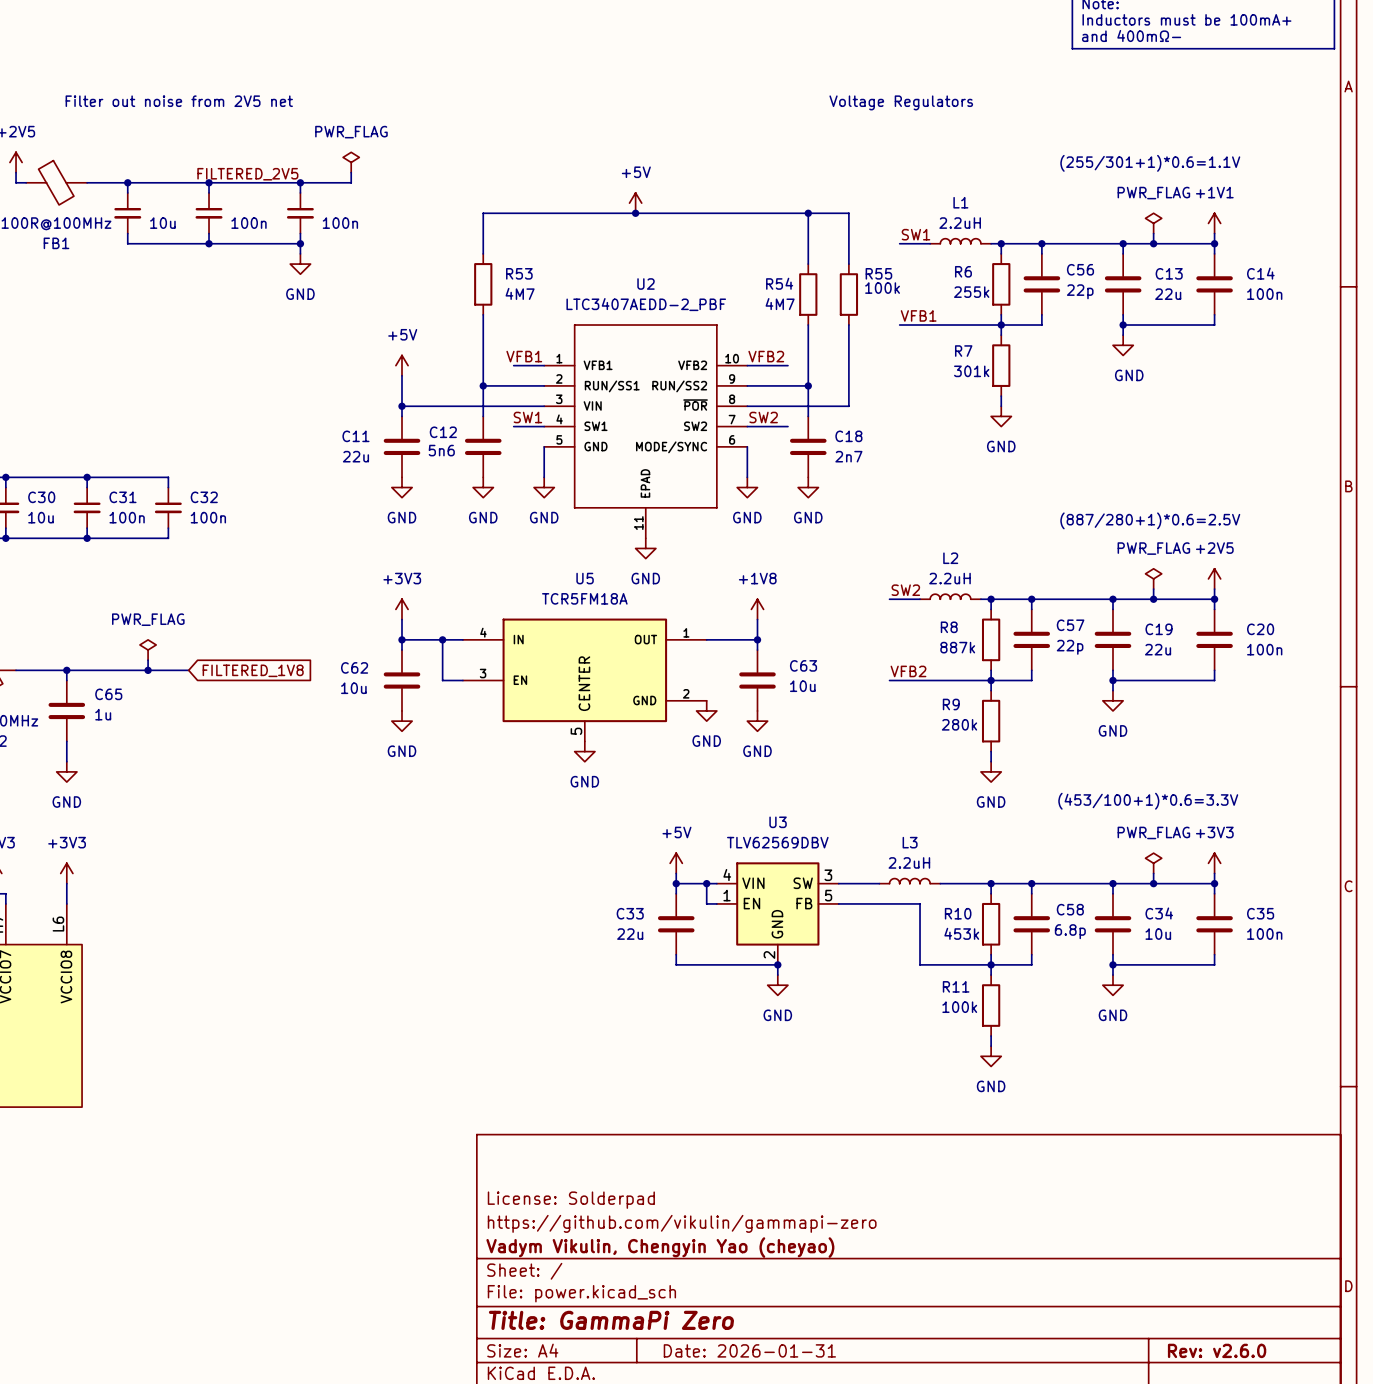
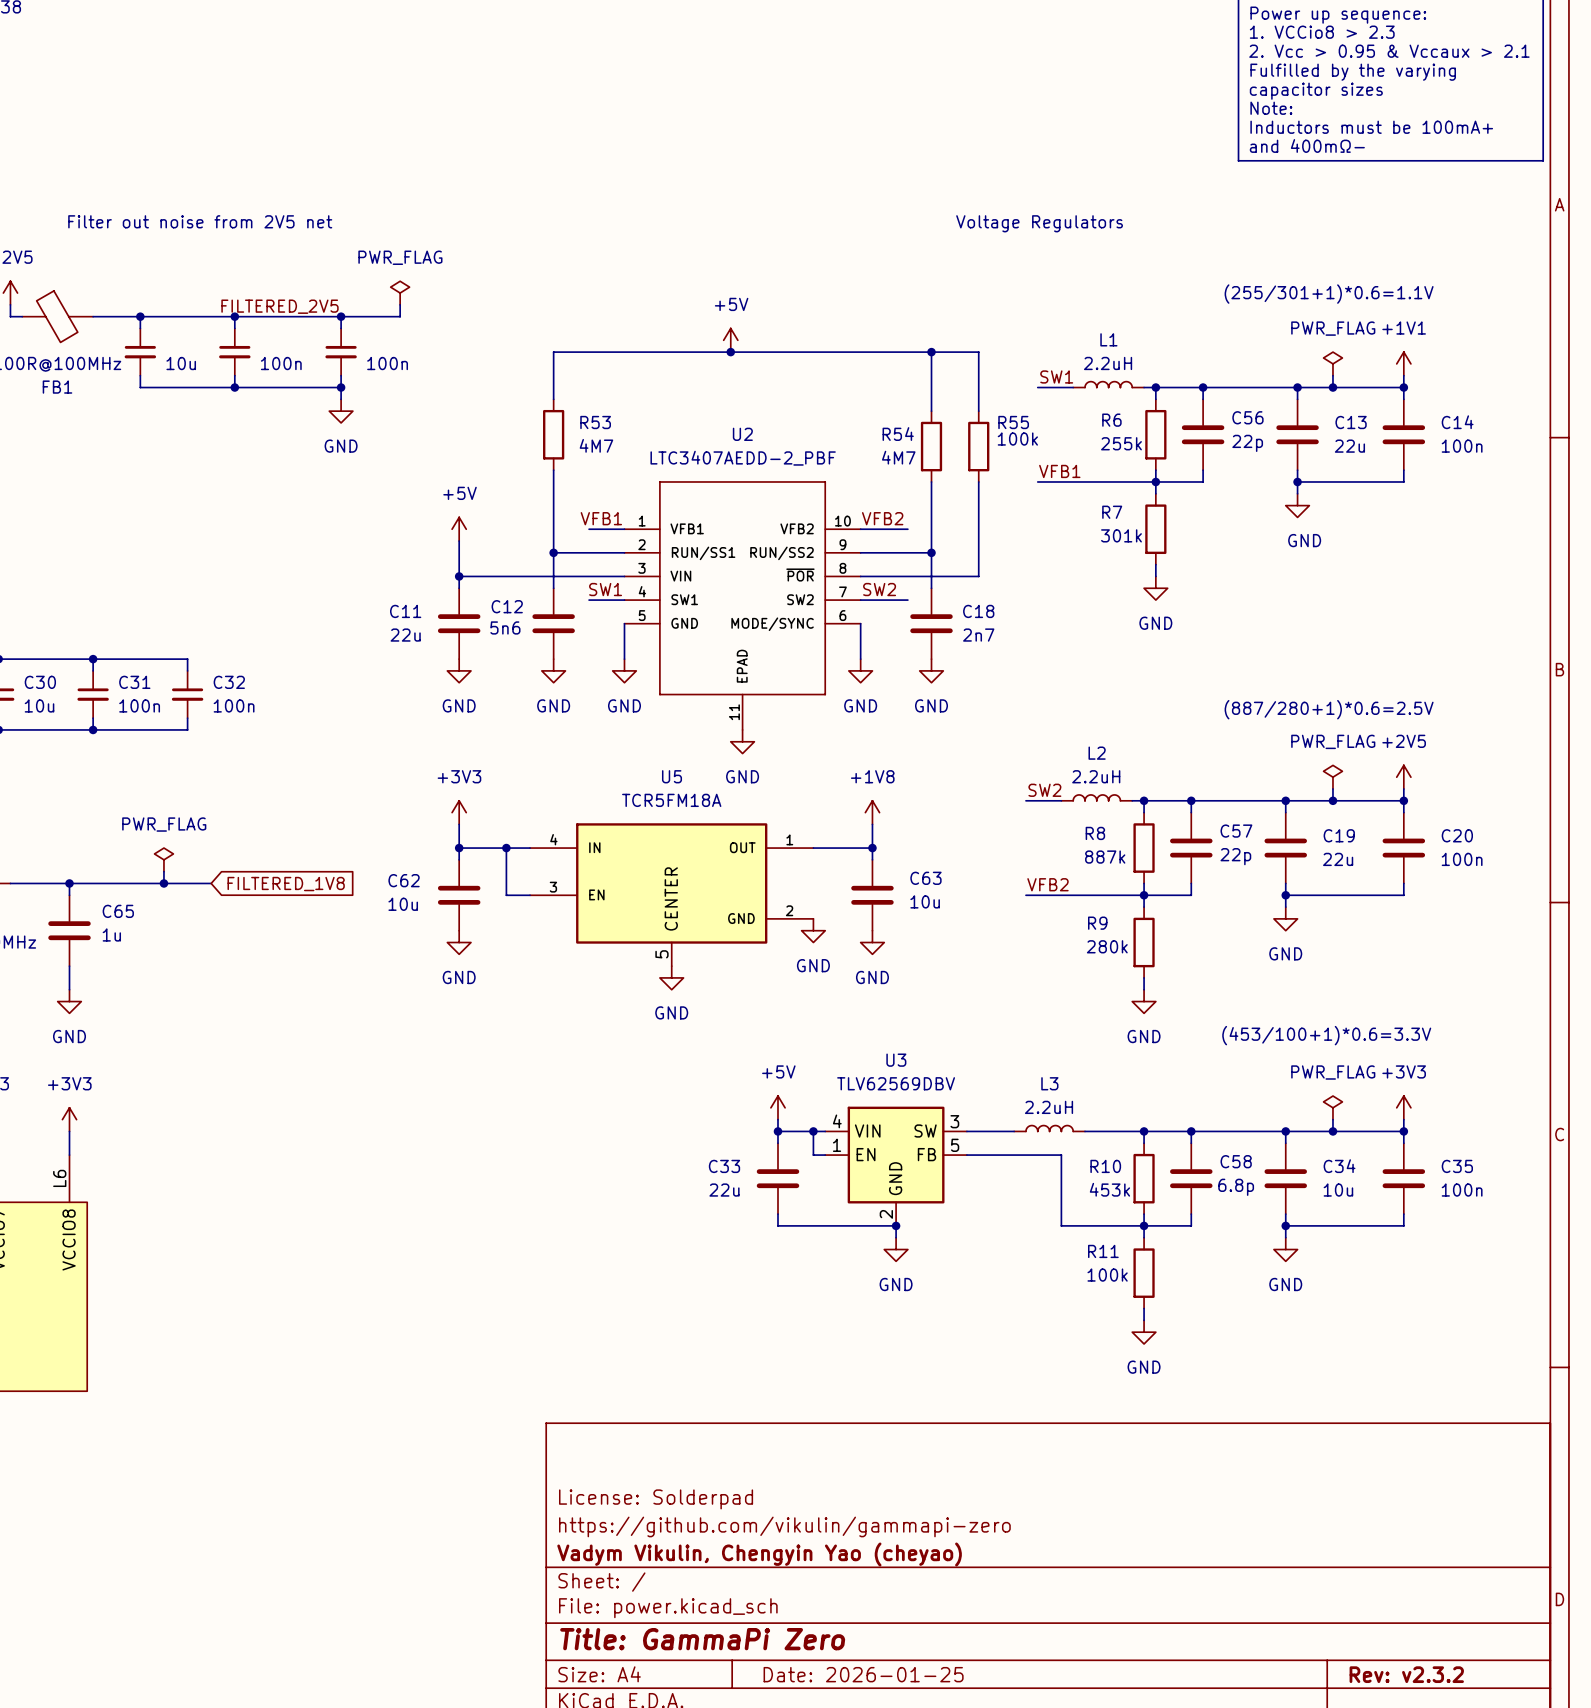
title block: Date: 2026-01-31 (749, 1350) -> Date: 2026-01-25 (863, 1674)
title block: Rev: v2.6.0 (1217, 1350) -> Rev: v2.3.2 (1406, 1674)

